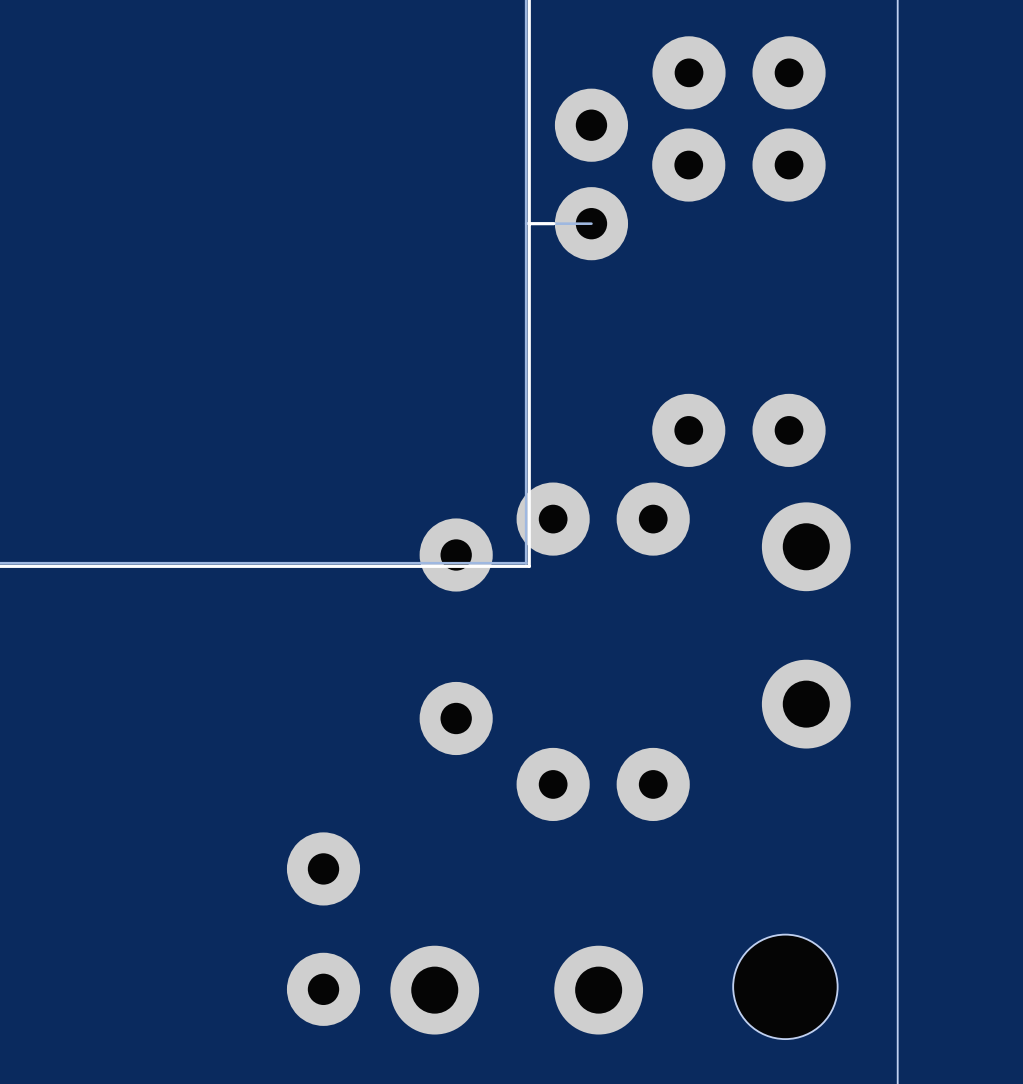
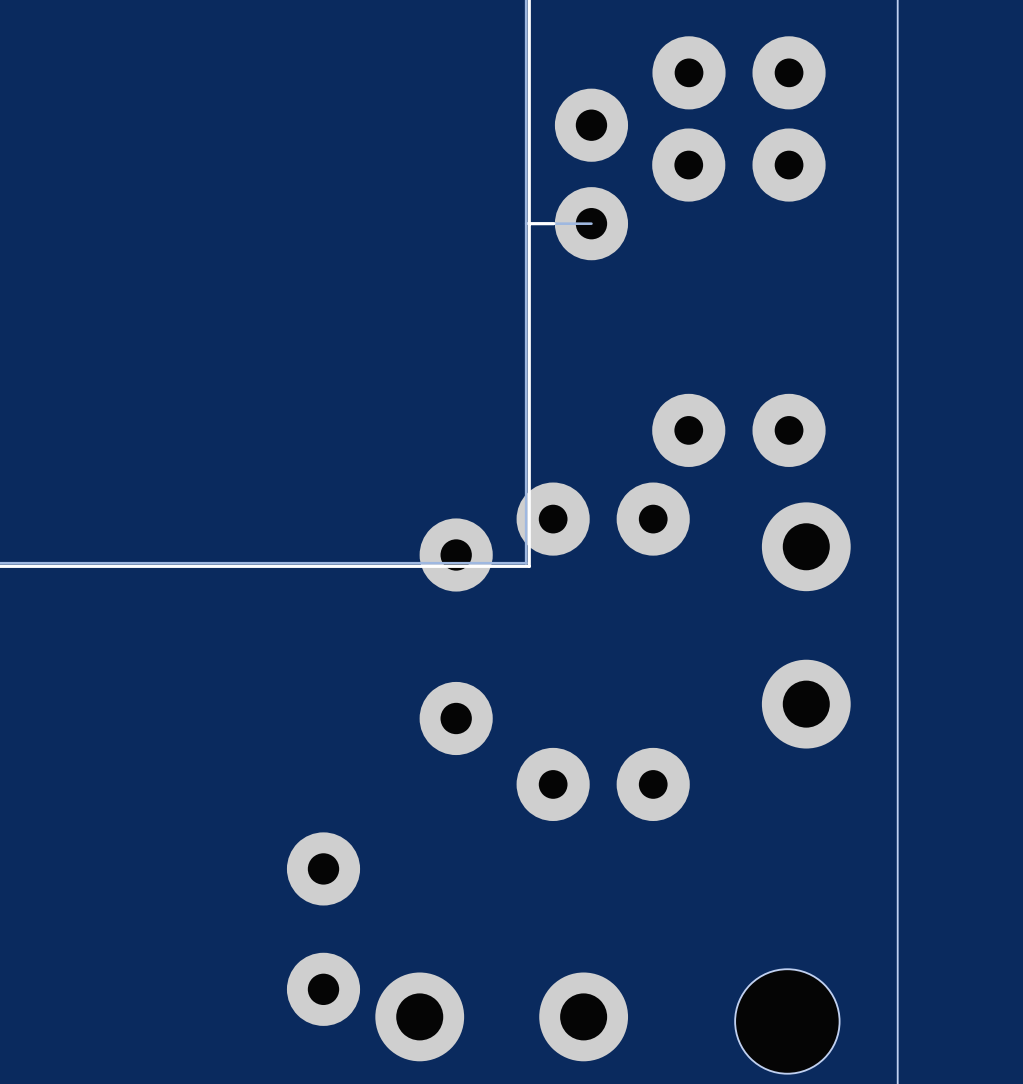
part position: (785, 986) -> (787, 1021)
part position: (434, 990) -> (419, 1016)
part position: (598, 990) -> (583, 1016)

